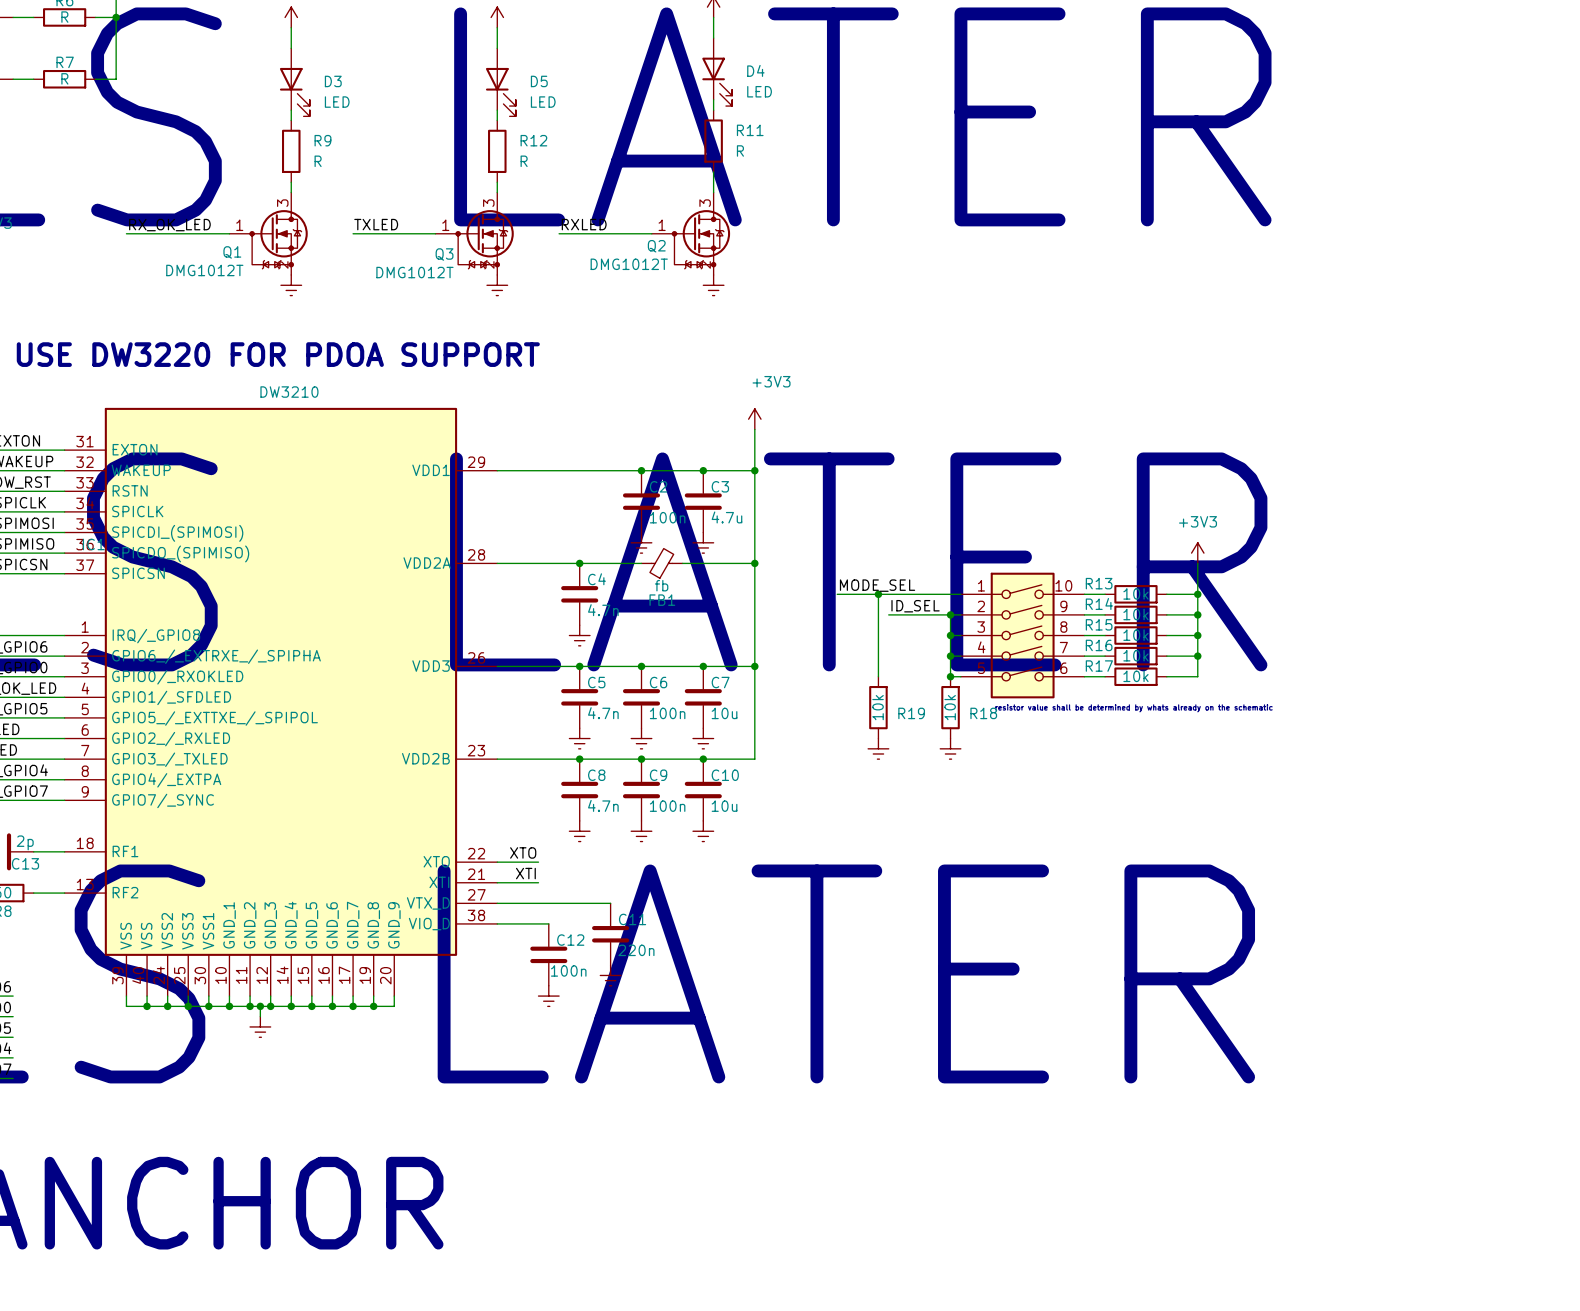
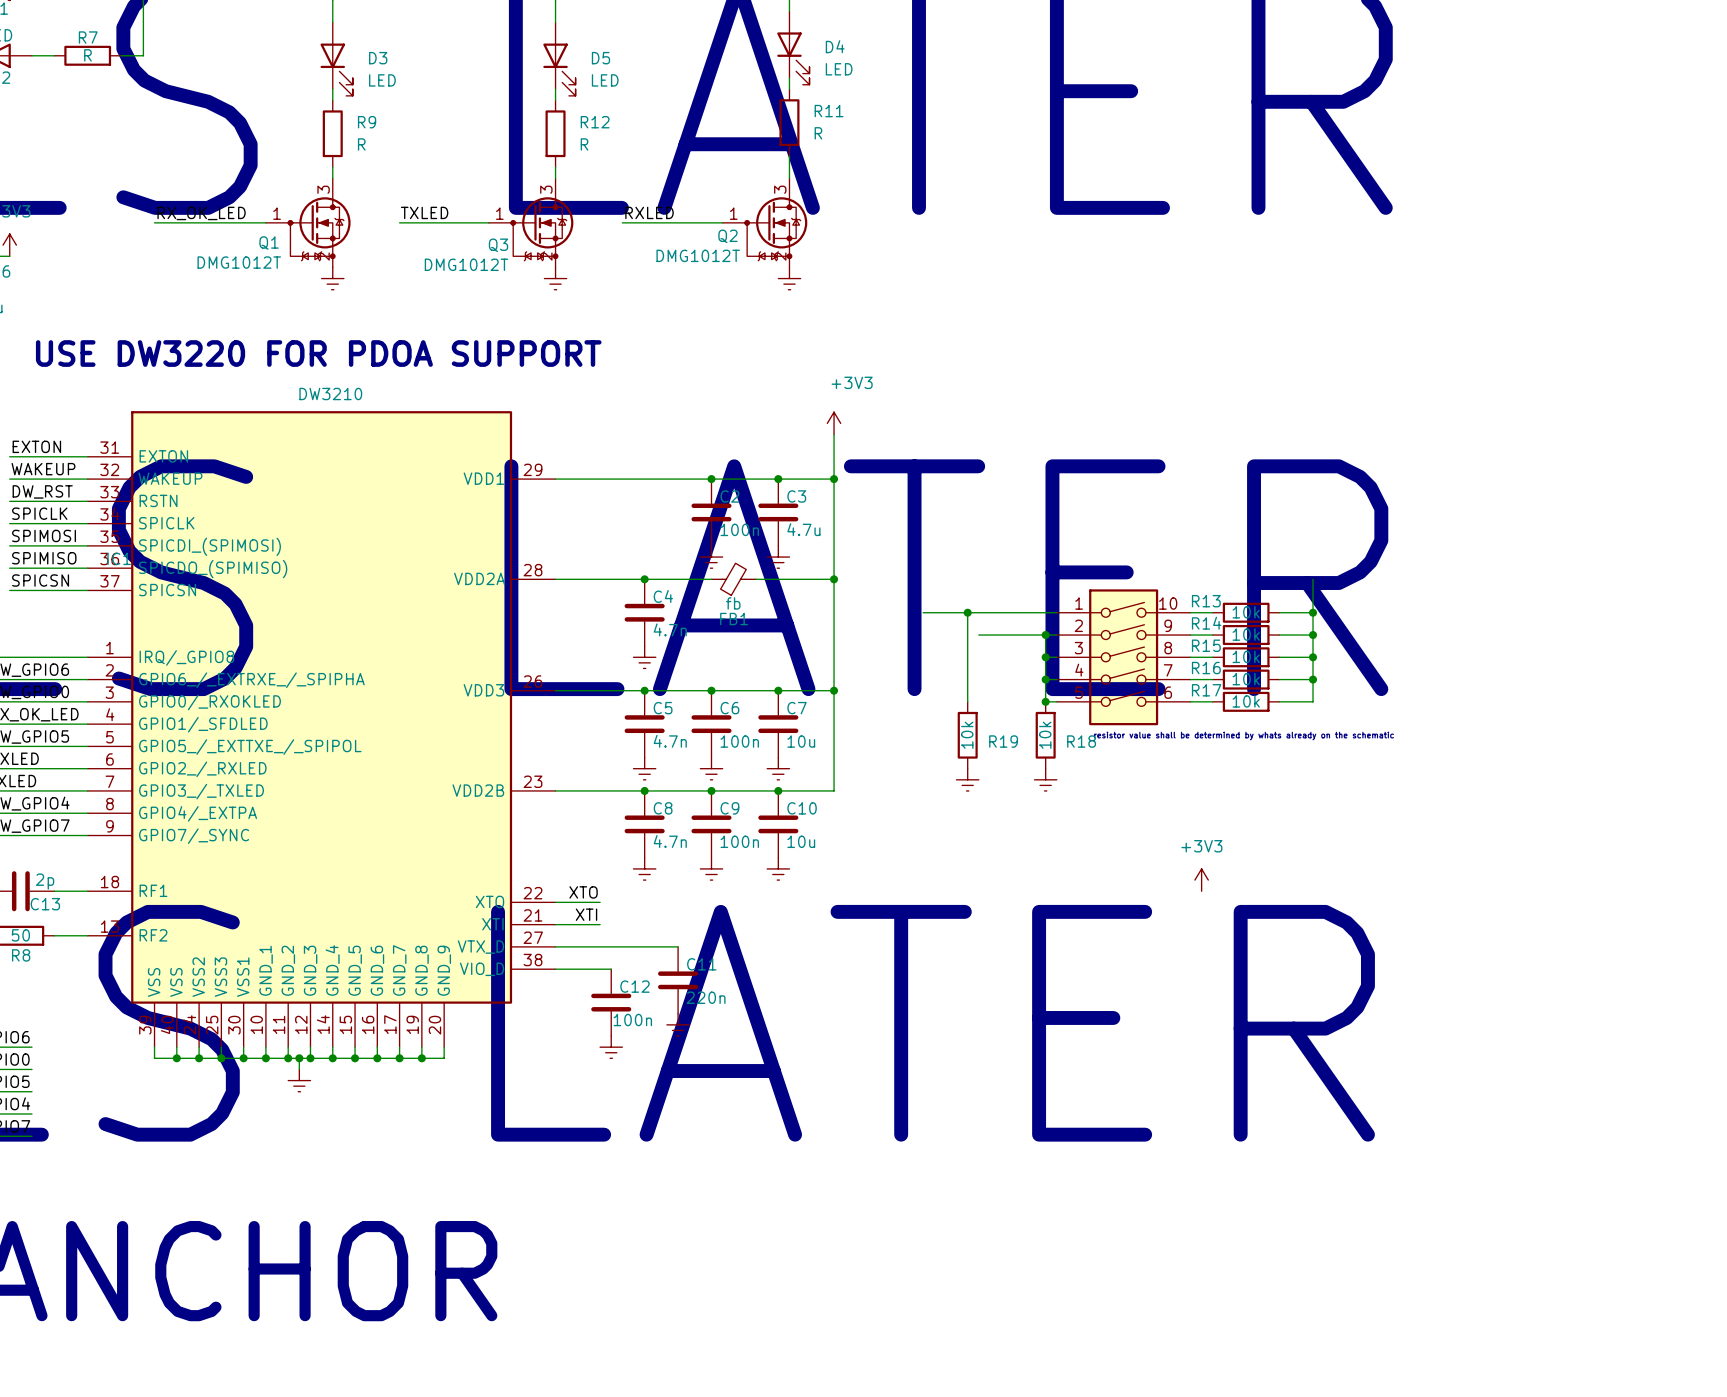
power symbol: +3V3 (1197, 553) -> none
label: MODE_SEL (877, 585) -> none
label: ID_SEL (915, 606) -> none
power symbol: none -> +3V3 (1201, 880)

